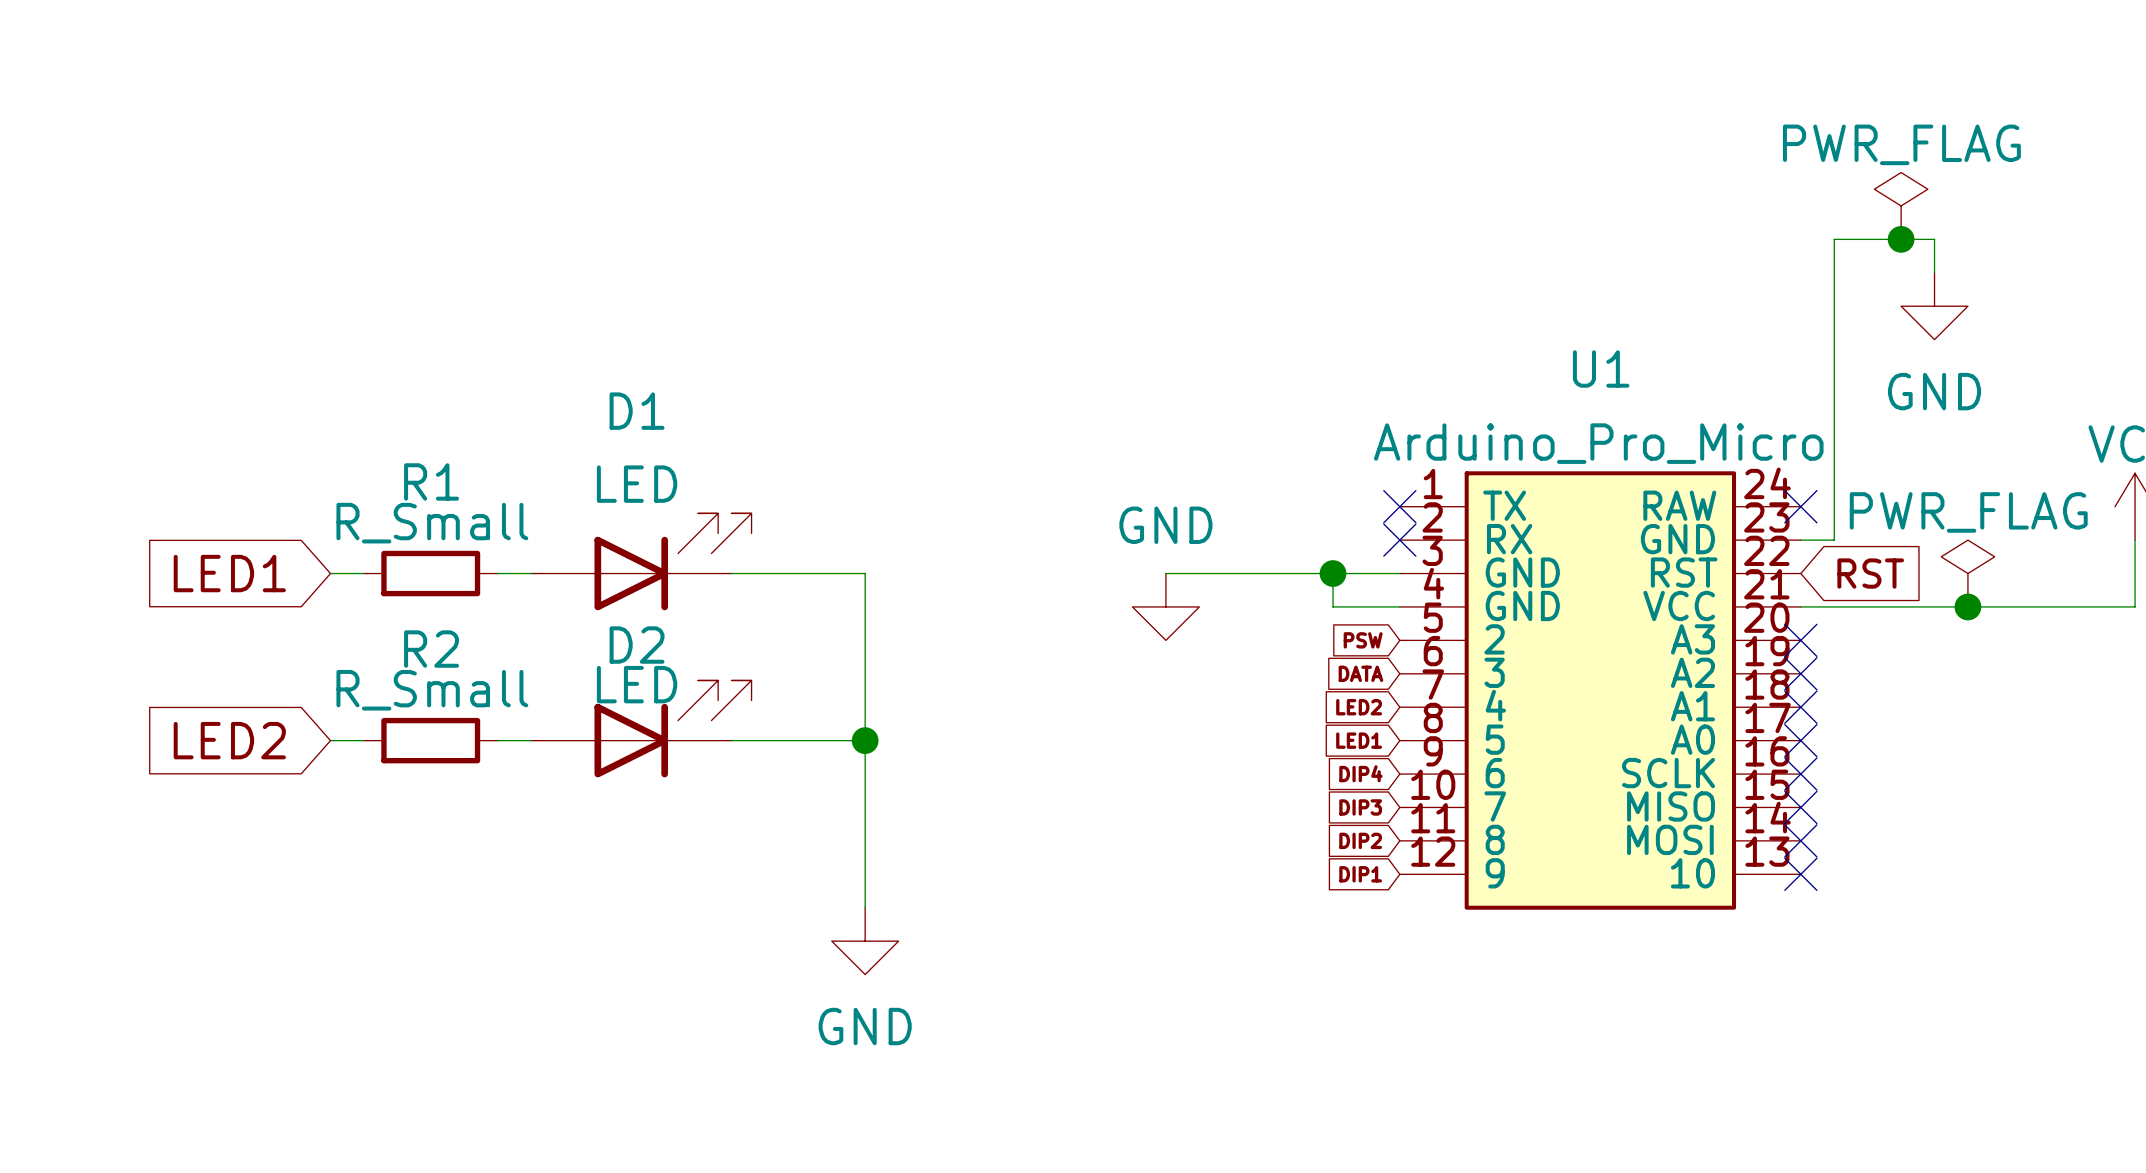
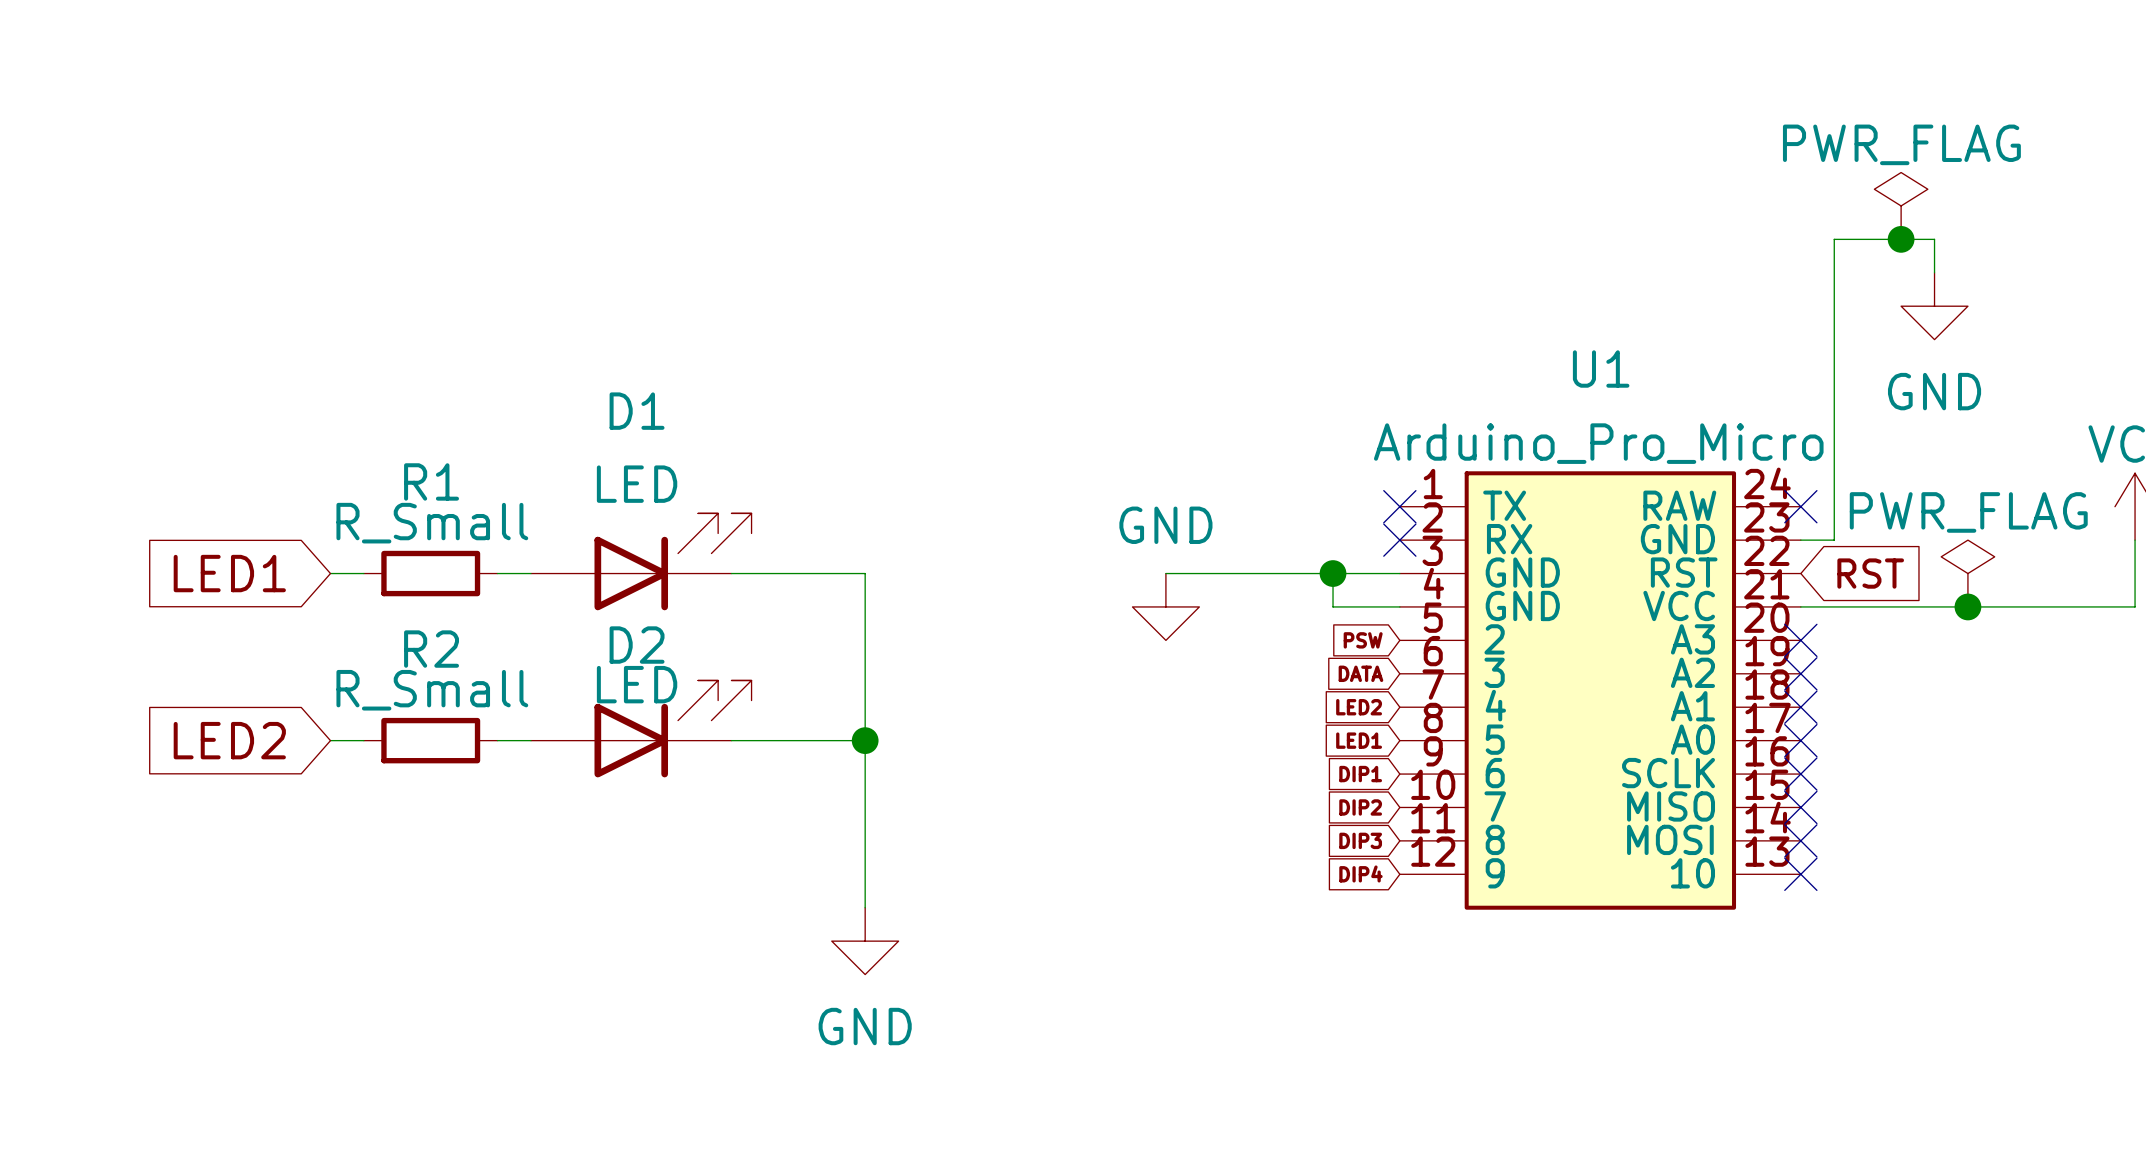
global label: DIP4 (1360, 773) -> DIP1 (1360, 774)
global label: DIP3 (1360, 807) -> DIP2 (1360, 807)
global label: DIP2 (1360, 840) -> DIP3 (1360, 840)
global label: DIP1 (1360, 874) -> DIP4 (1360, 873)

